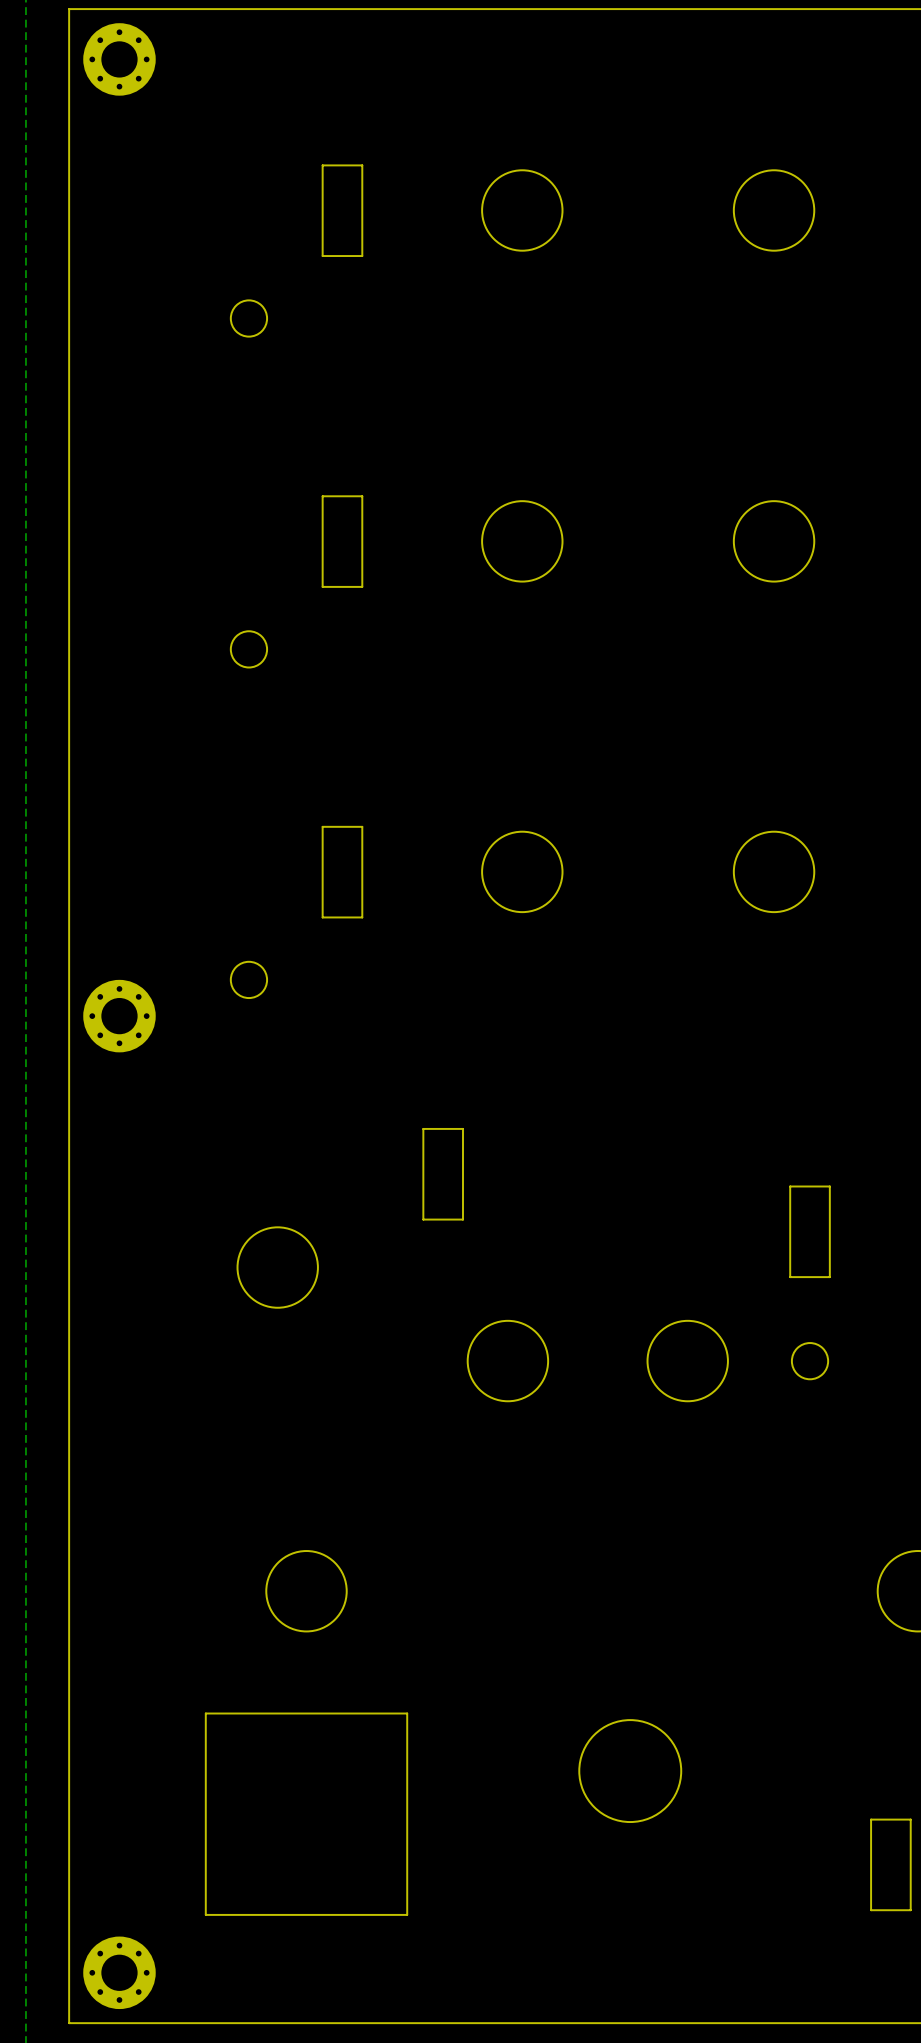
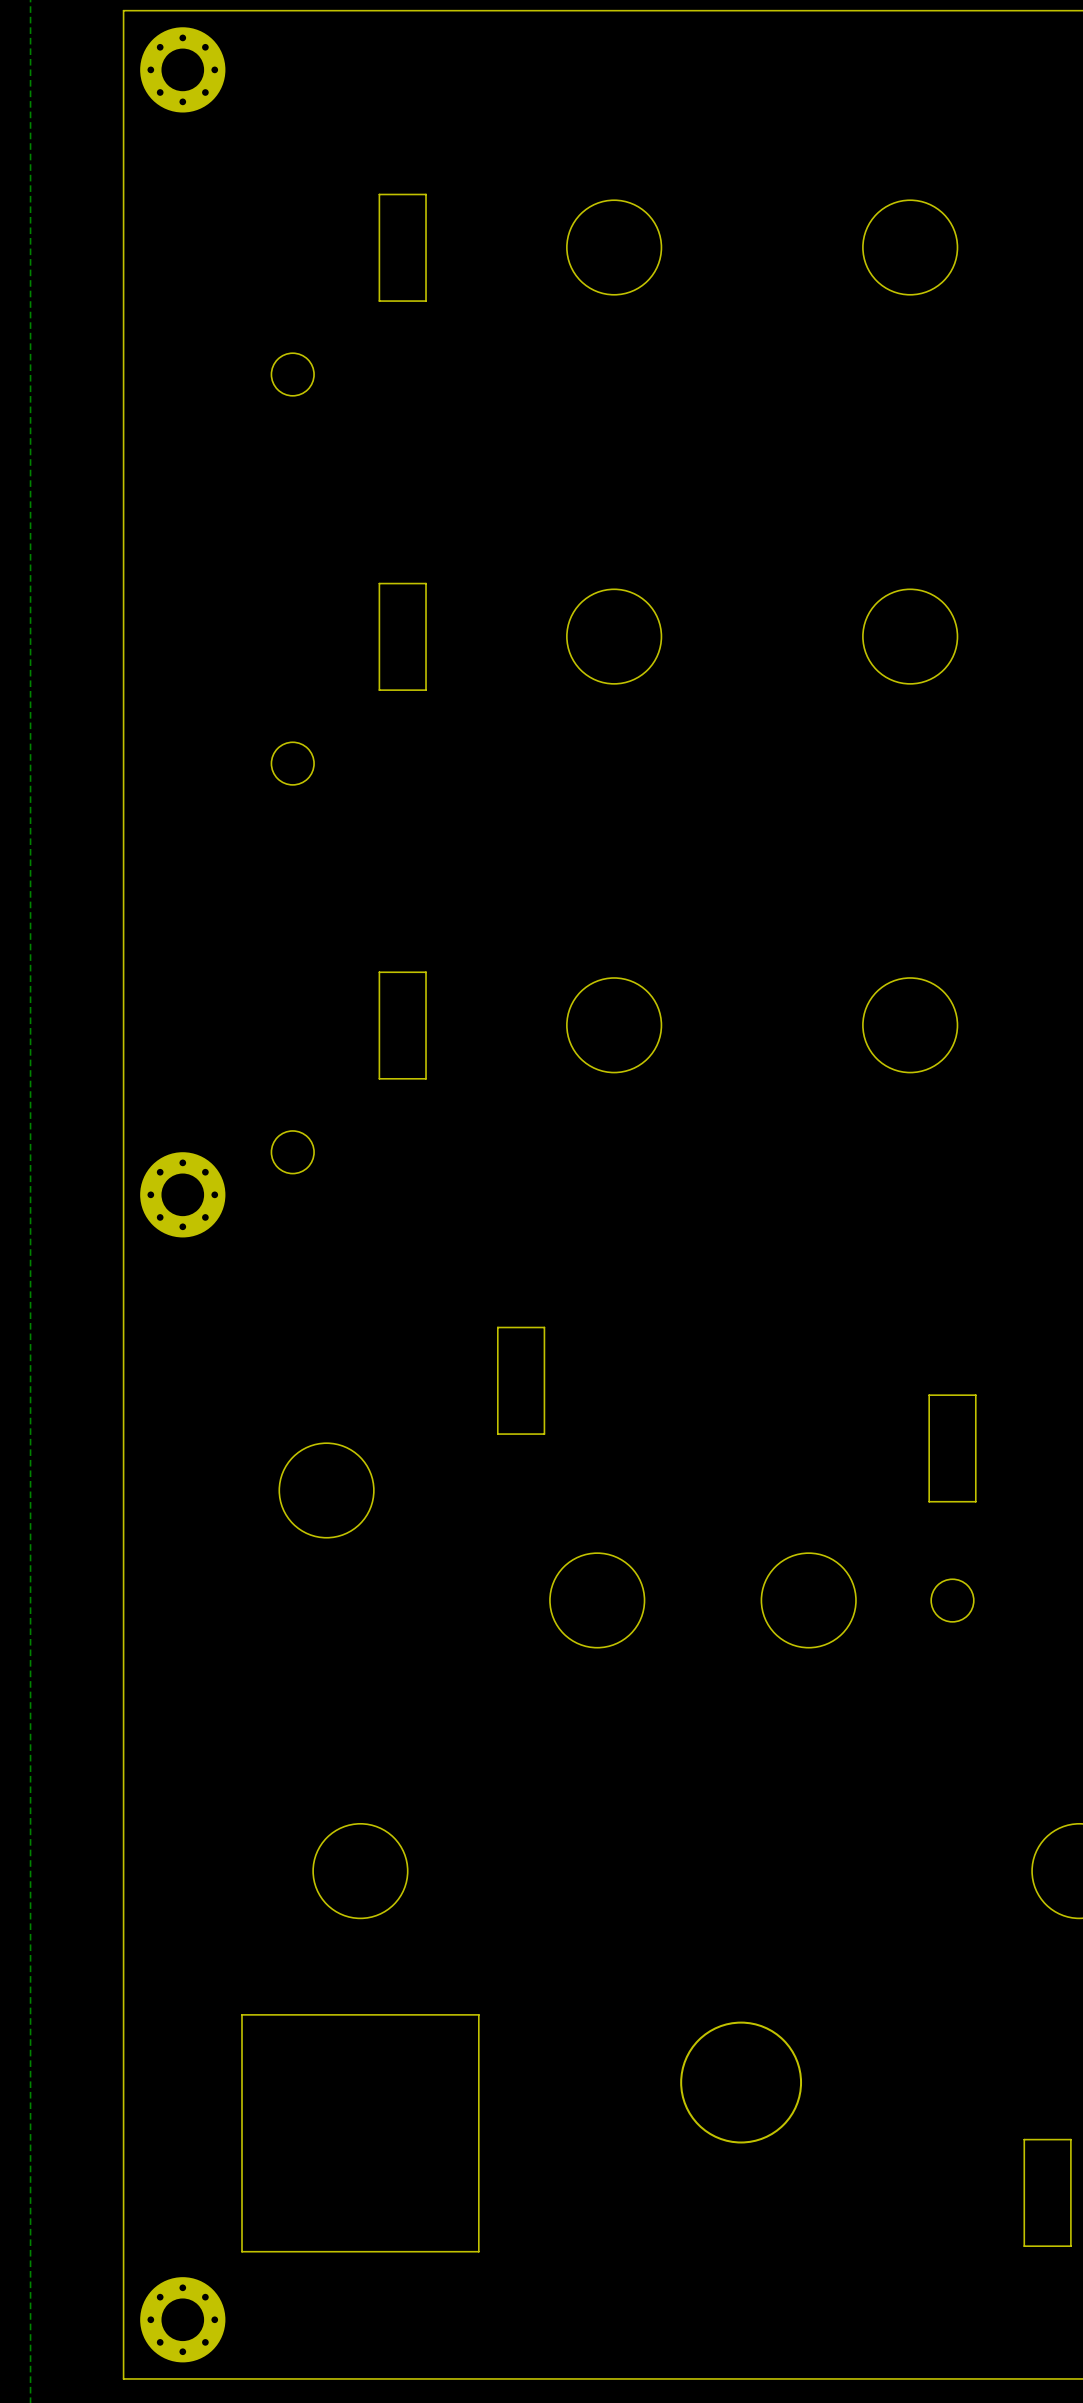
board edge: (105, 9) (69, 9) (69, 2023) (105, 2023) -> (123, 10) (123, 2378)
part position: (119, 59) -> (182, 69)
part position: (119, 1016) -> (182, 1194)
part position: (119, 1972) -> (182, 2319)

